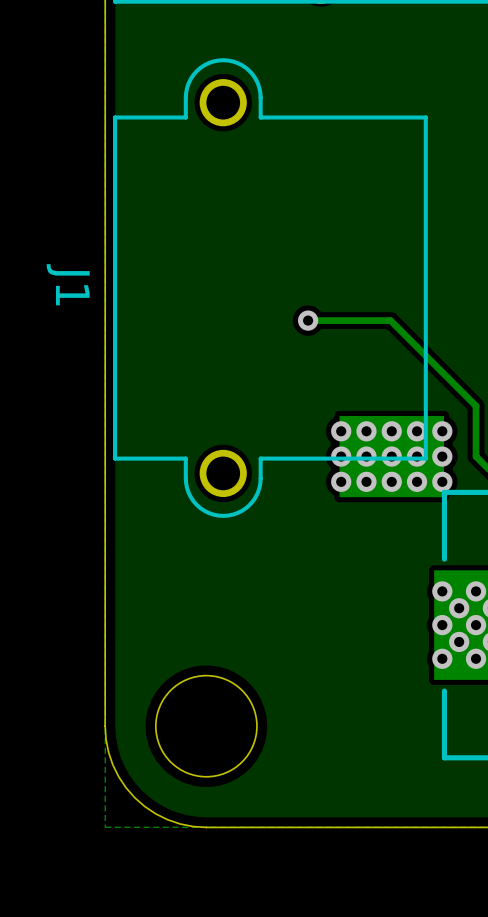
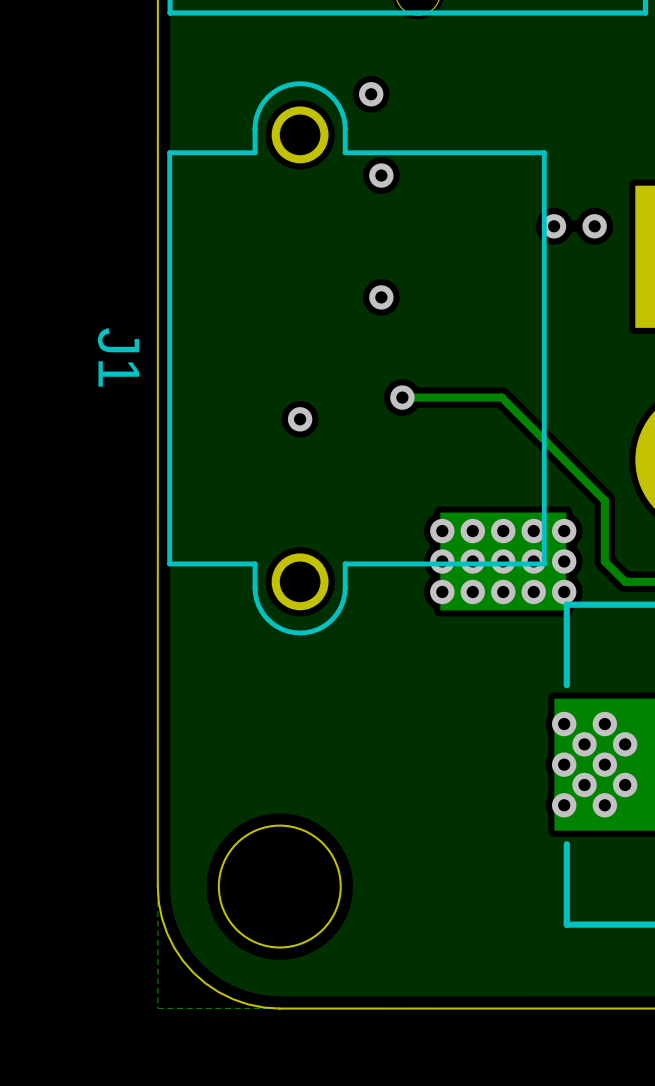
via: none -> (371, 94)
via: none -> (381, 175)
via: none -> (554, 226)
via: none -> (594, 226)
via: none -> (381, 297)
via: none -> (300, 419)

